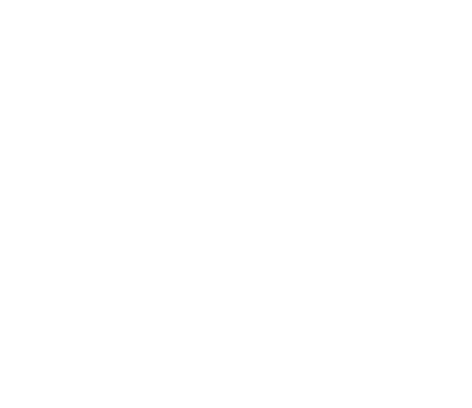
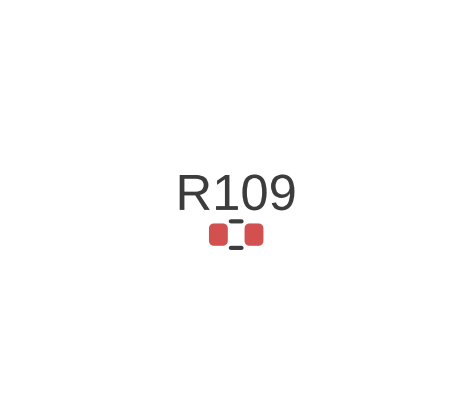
R109: none -> (236, 234)

